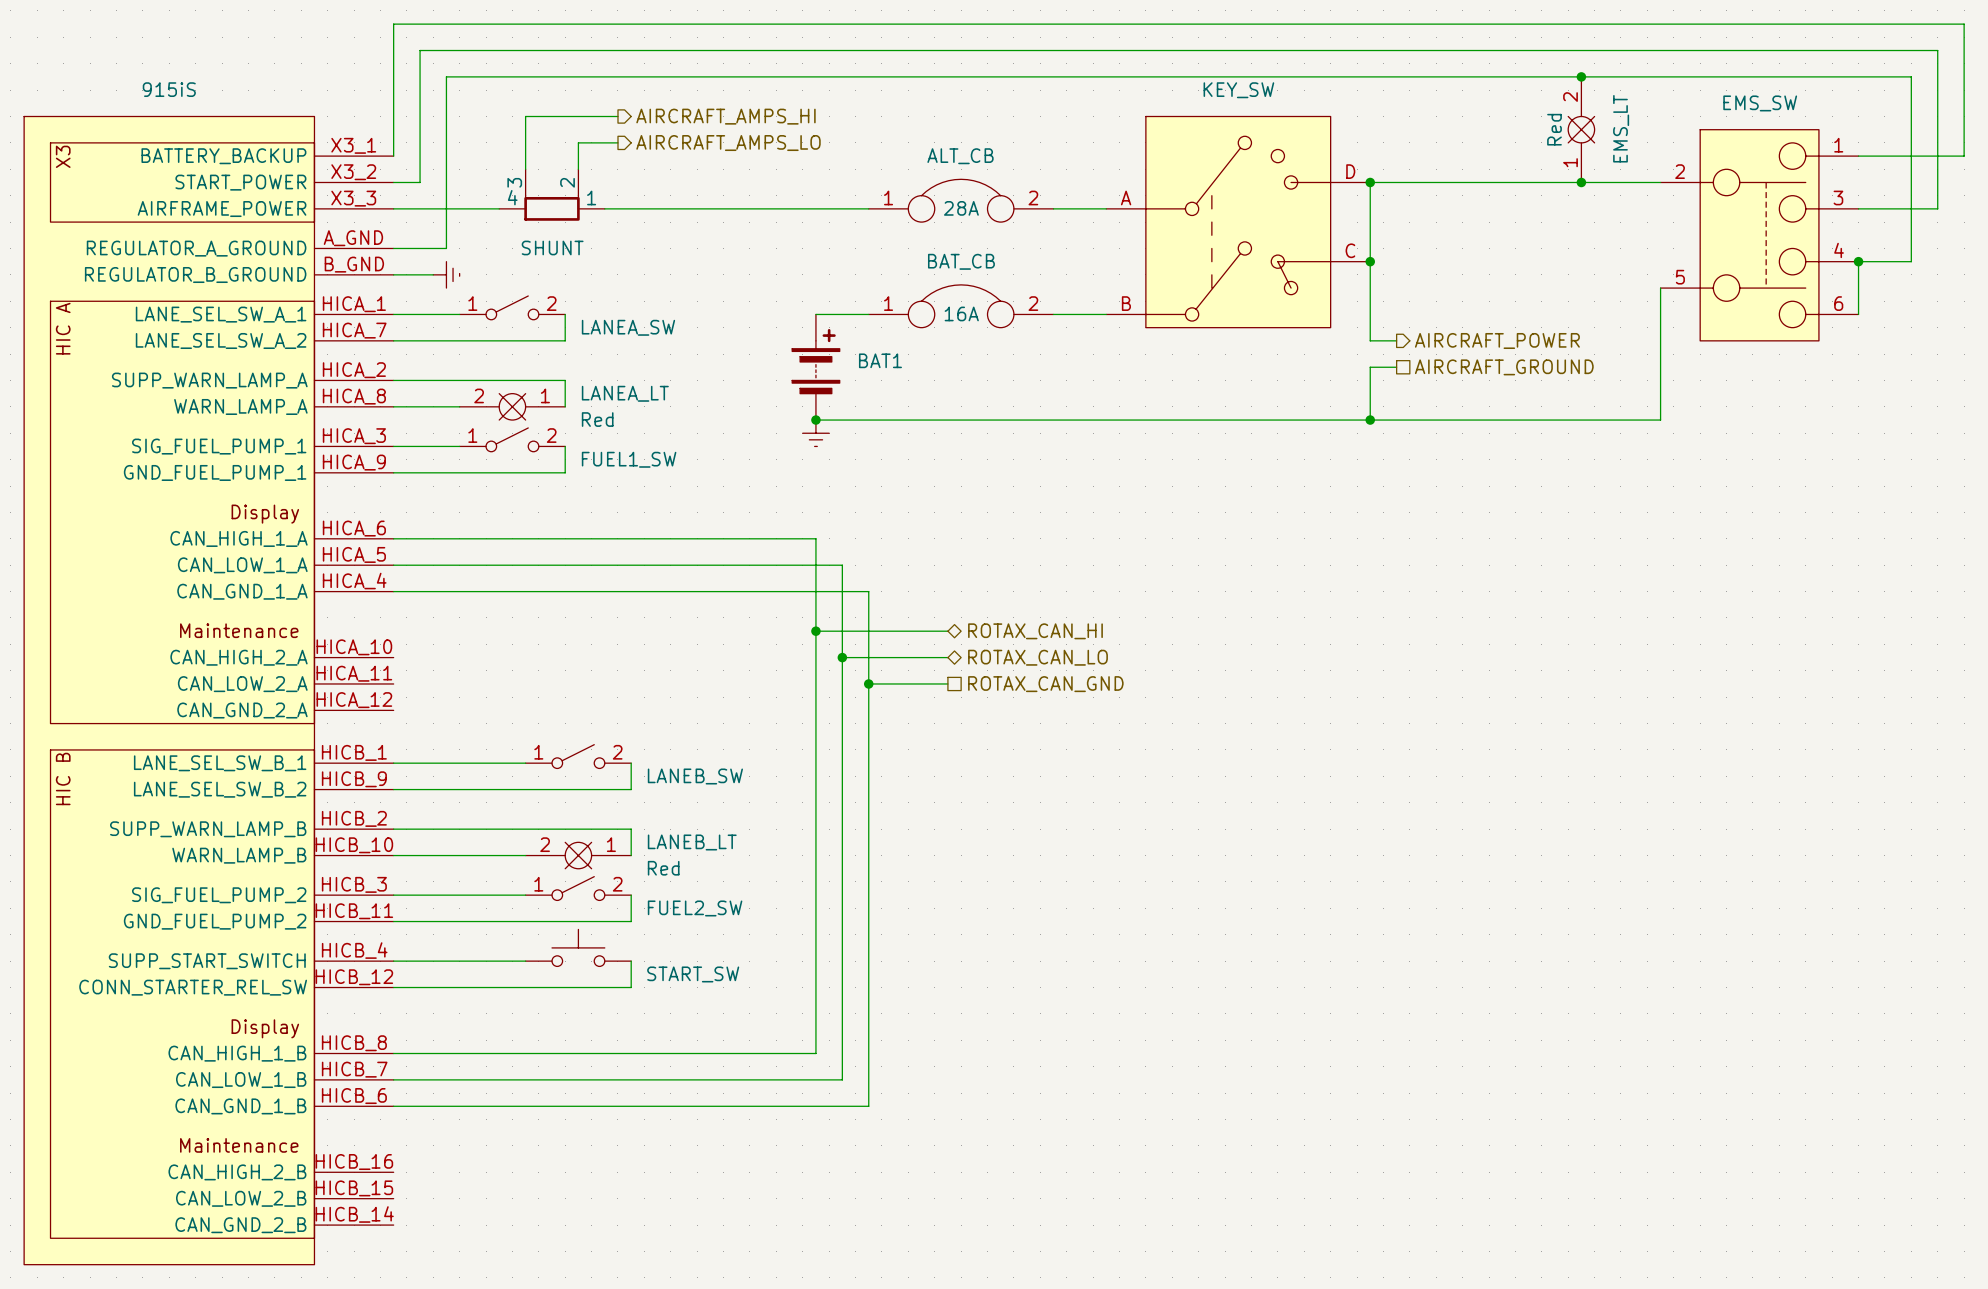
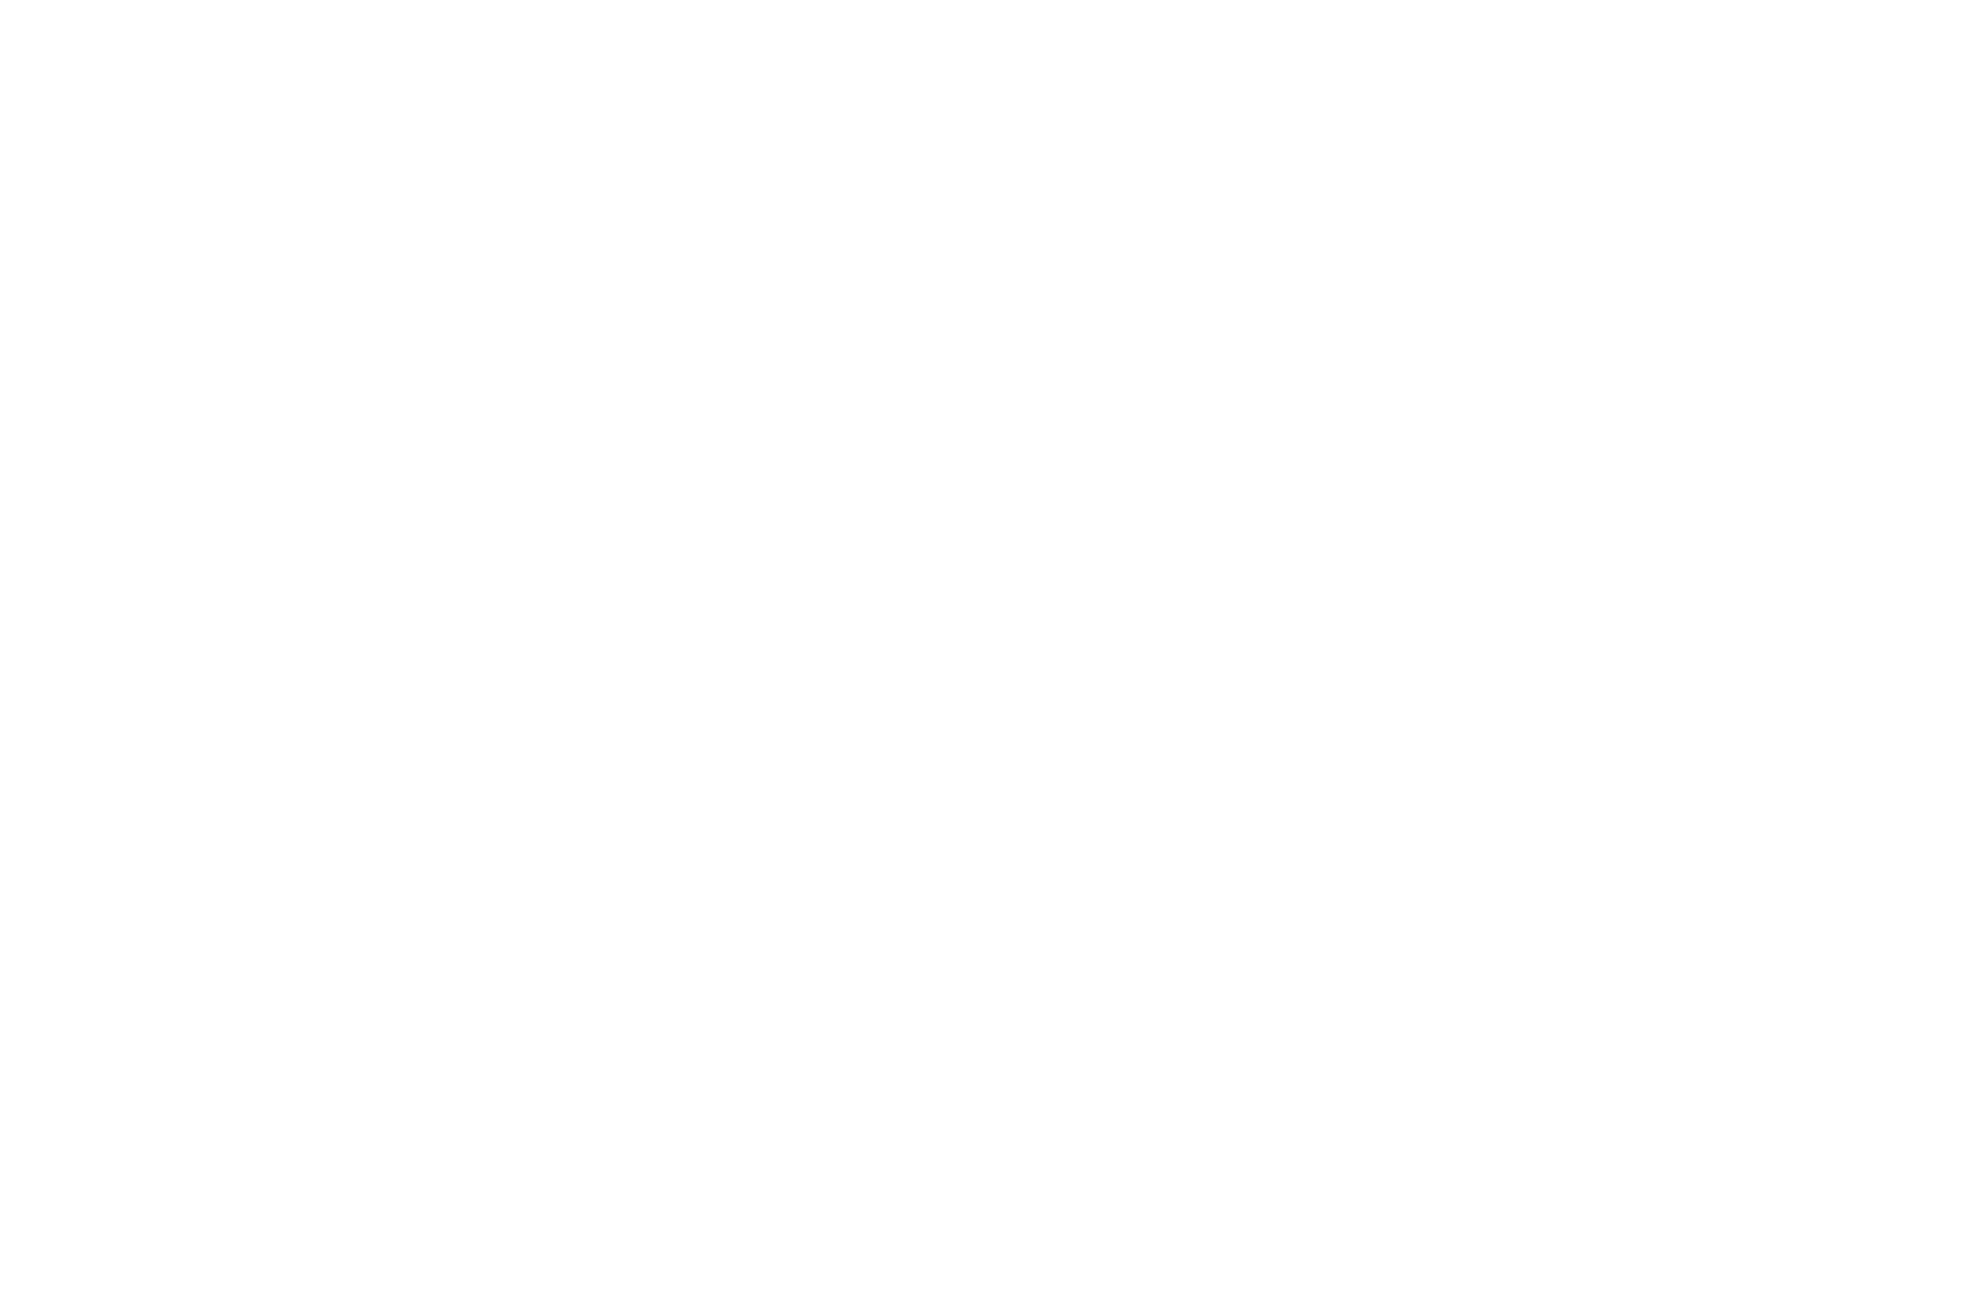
junction: (1581, 76) -> none
wire: (617, 116) (525, 116) (525, 169) -> none
hierarchical label: AIRCRAFT_AMPS_HI (725, 116) -> none
EMS_LT: Red (1581, 129) -> none
wire: (617, 142) (578, 142) (578, 169) -> none
hierarchical label: AIRCRAFT_AMPS_LO (728, 143) -> none
wire: (393, 156) (393, 24) (1964, 24) (1964, 156) (1858, 156) -> none
wire: (393, 182) (420, 182) (420, 50) (1937, 50) (1937, 208) (1858, 208) -> none
junction: (1370, 182) -> none
junction: (1581, 182) -> none
wire: (1660, 182) (1370, 182) (1370, 340) (1396, 340) -> none
SHUNT: (552, 195) -> none
ALT_CB: 28A (961, 200) -> none
wire: (393, 208) (499, 208) -> none
wire: (604, 208) (868, 208) -> none
wire: (1053, 208) (1106, 208) -> none
KEY_SW: (1238, 222) -> none
EMS_SW: (1759, 235) -> none
wire: (393, 248) (446, 248) (446, 76) (1911, 76) (1911, 261) (1858, 261) (1858, 314) -> none
junction: (1370, 261) -> none
junction: (1858, 261) -> none
wire: (393, 274) (433, 274) -> none
power symbol: (446, 274) -> none
wire: (1660, 288) (1660, 420) (815, 420) -> none
BAT_CB: 16A (961, 306) -> none
LANEA_SW: (512, 307) -> none
wire: (393, 314) (459, 314) -> none
wire: (565, 314) (565, 340) (393, 340) -> none
wire: (815, 314) (868, 314) -> none
wire: (1053, 314) (1106, 314) -> none
hierarchical label: AIRCRAFT_POWER (1497, 340) -> none
BAT1: (815, 367) -> none
wire: (1396, 367) (1370, 367) (1370, 420) -> none
hierarchical label: AIRCRAFT_GROUND (1504, 367) -> none
wire: (393, 380) (565, 380) (565, 406) -> none
wire: (393, 406) (459, 406) -> none
LANEA_LT: Red (512, 406) -> none
junction: (815, 420) -> none
junction: (1370, 420) -> none
power symbol: (815, 433) -> none
FUEL1_SW: (512, 439) -> none
wire: (393, 446) (459, 446) -> none
wire: (565, 446) (565, 472) (393, 472) -> none
wire: (393, 538) (815, 538) (815, 1053) (393, 1053) -> none
wire: (393, 565) (842, 565) (842, 1079) (393, 1079) -> none
wire: (393, 591) (868, 591) (868, 1106) (393, 1106) -> none
wire: (815, 631) (947, 631) -> none
junction: (815, 631) -> none
hierarchical label: ROTAX_CAN_HI (1035, 631) -> none
wire: (842, 657) (947, 657) -> none
junction: (842, 657) -> none
hierarchical label: ROTAX_CAN_LO (1038, 657) -> none
wire: (868, 683) (947, 683) -> none
junction: (868, 683) -> none
hierarchical label: ROTAX_CAN_GND (1045, 684) -> none
915iS: (208, 690) -> none
LANEB_SW: (578, 756) -> none
wire: (393, 763) (525, 763) -> none
wire: (631, 763) (631, 789) (393, 789) -> none
wire: (393, 829) (631, 829) (631, 855) -> none
wire: (393, 855) (525, 855) -> none
LANEB_LT: Red (578, 855) -> none
FUEL2_SW: (578, 888) -> none
wire: (393, 895) (525, 895) -> none
wire: (631, 895) (631, 921) (393, 921) -> none
START_SW: (578, 947) -> none
wire: (393, 961) (525, 961) -> none
wire: (631, 961) (631, 987) (393, 987) -> none

